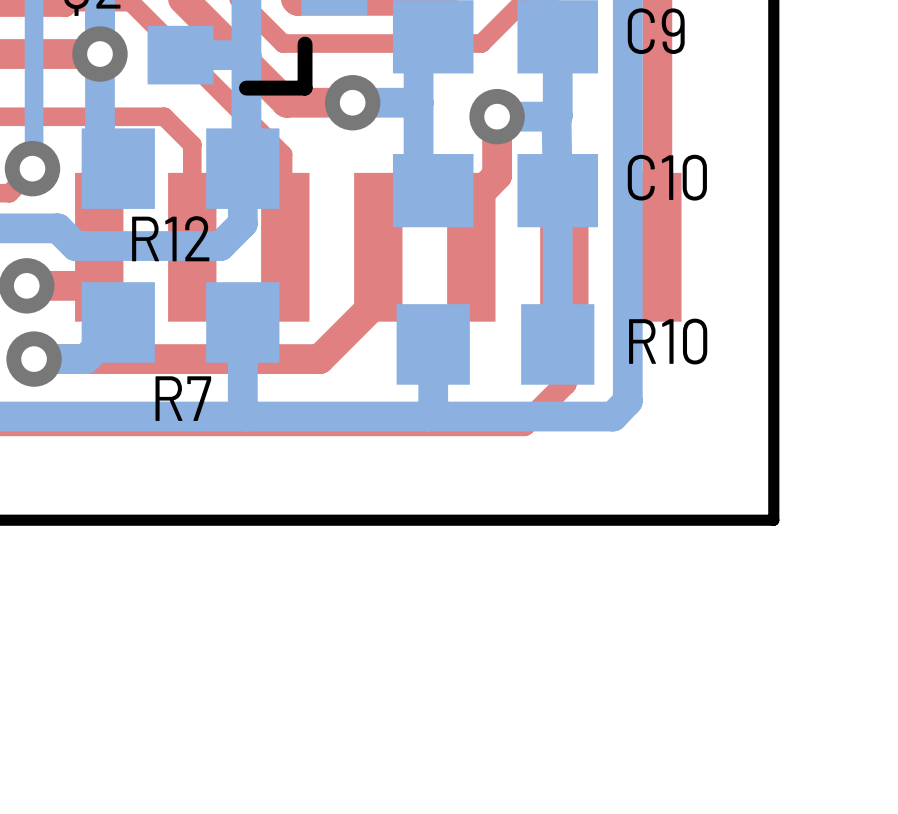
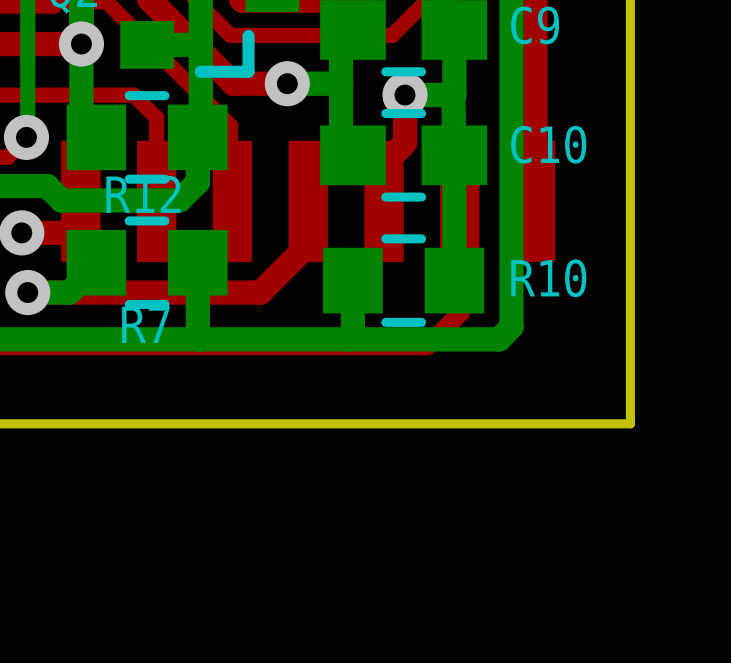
line: none -> (421, 71) (385, 71)
line: none -> (164, 95) (129, 95)
line: none -> (421, 113) (385, 113)
line: none -> (164, 179) (129, 179)
line: none -> (421, 197) (385, 197)
line: none -> (164, 220) (129, 220)
line: none -> (421, 238) (385, 238)
line: none -> (164, 304) (129, 304)
line: none -> (421, 322) (385, 322)

